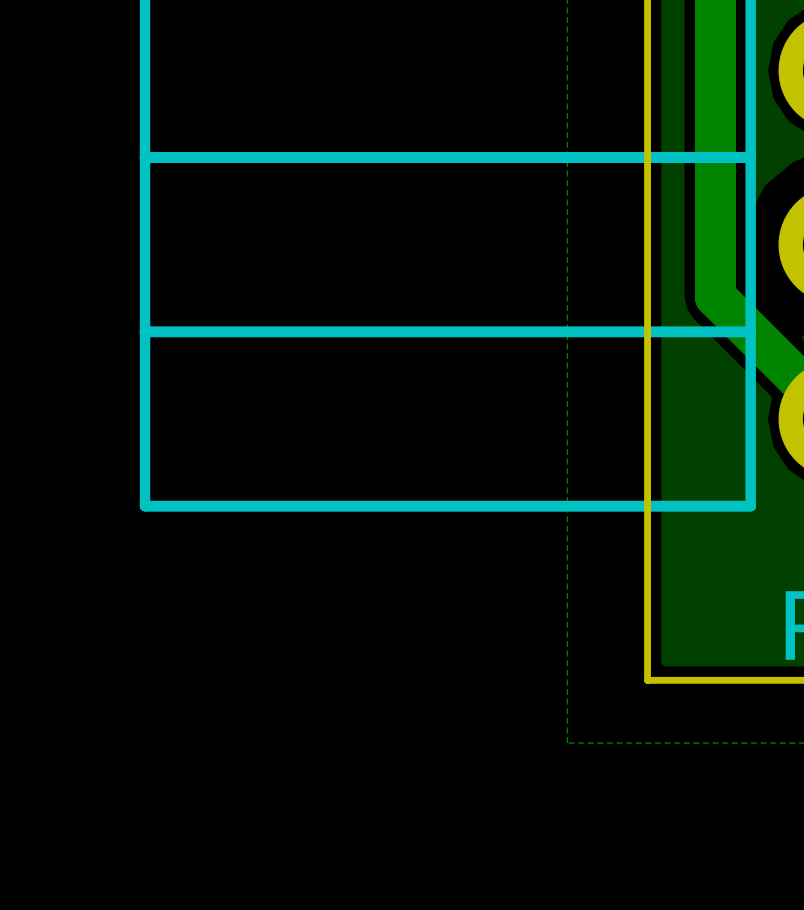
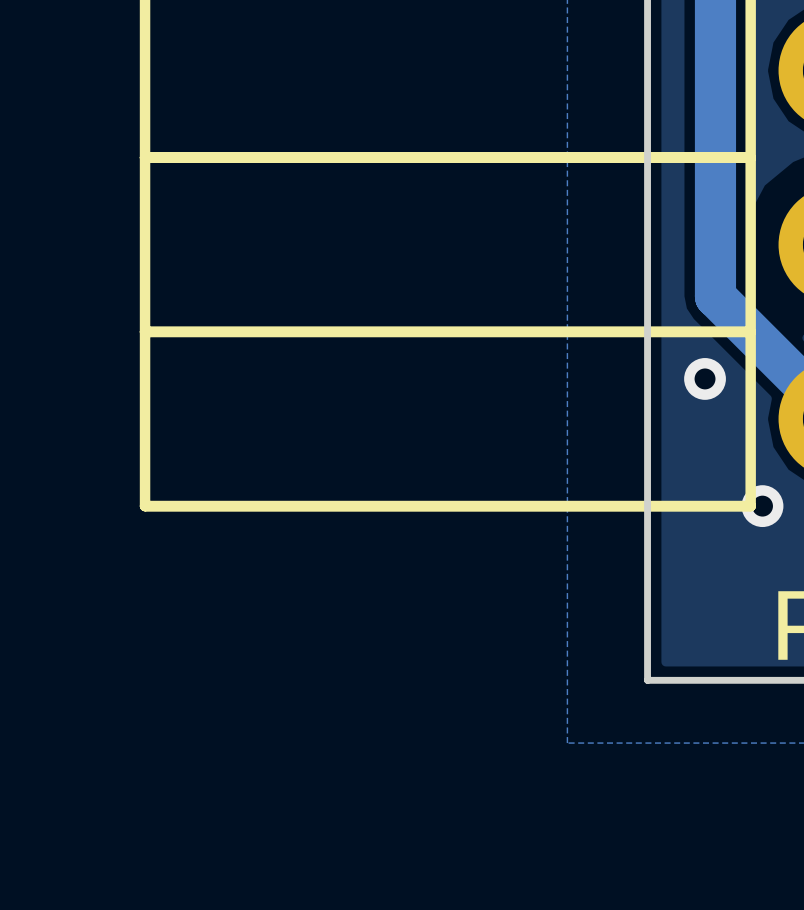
via: none -> (705, 378)
via: none -> (762, 506)

